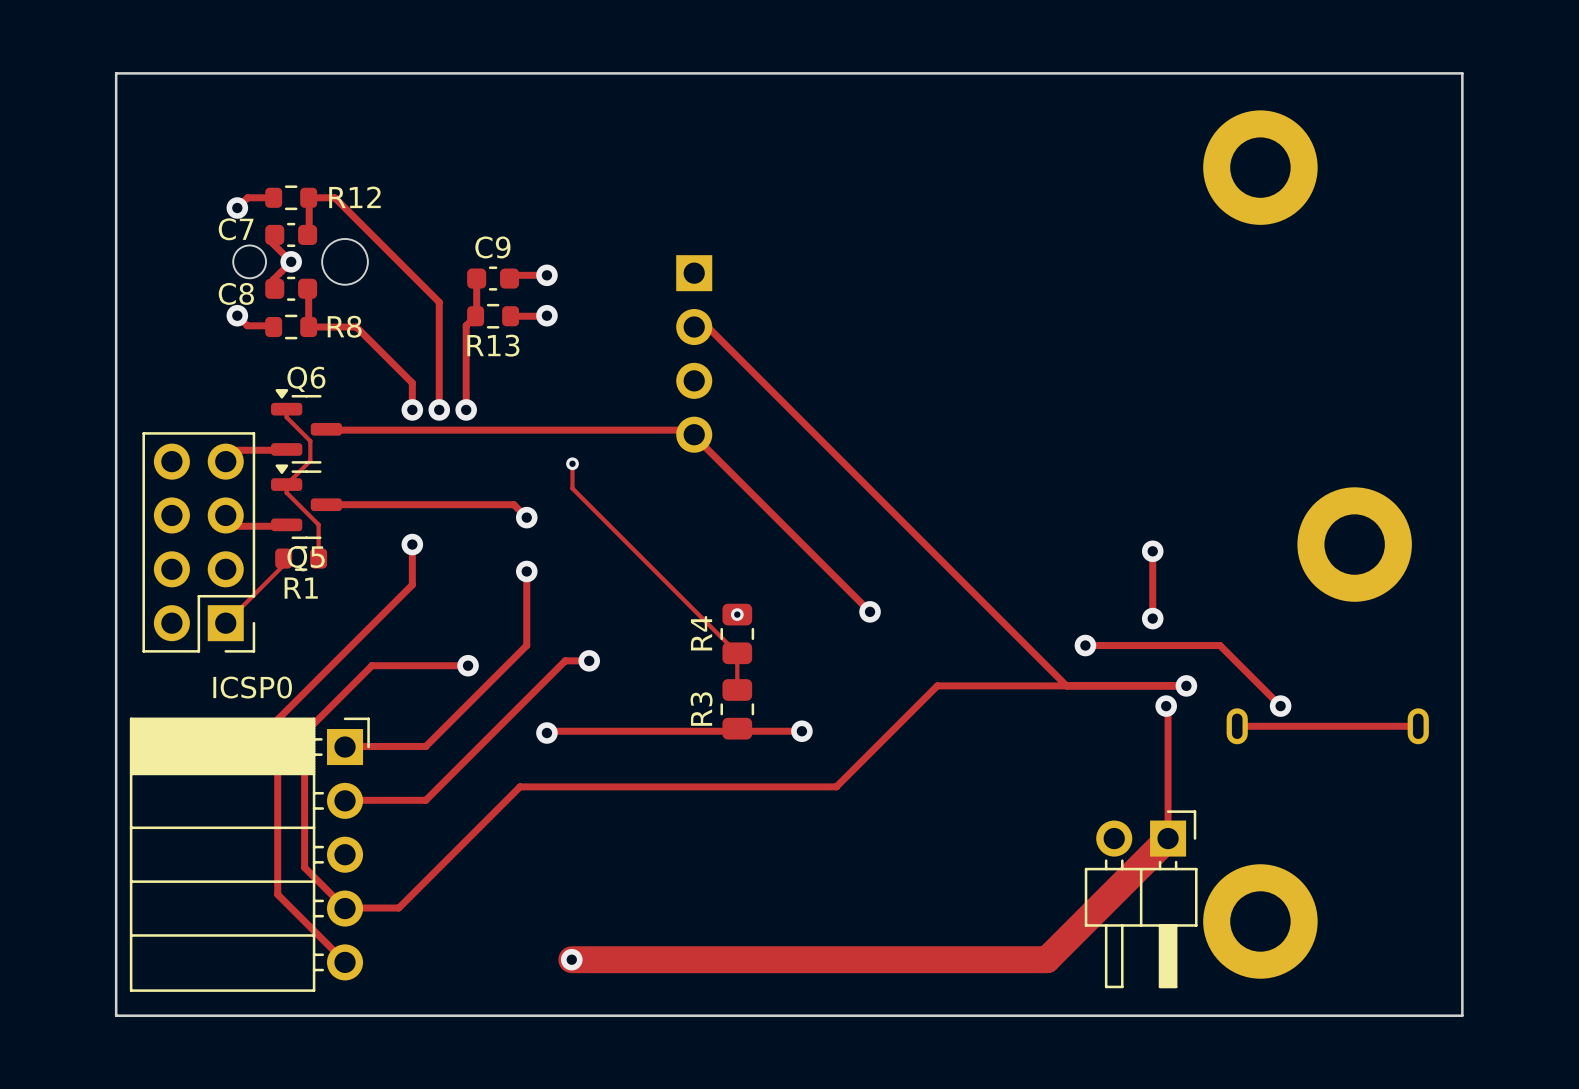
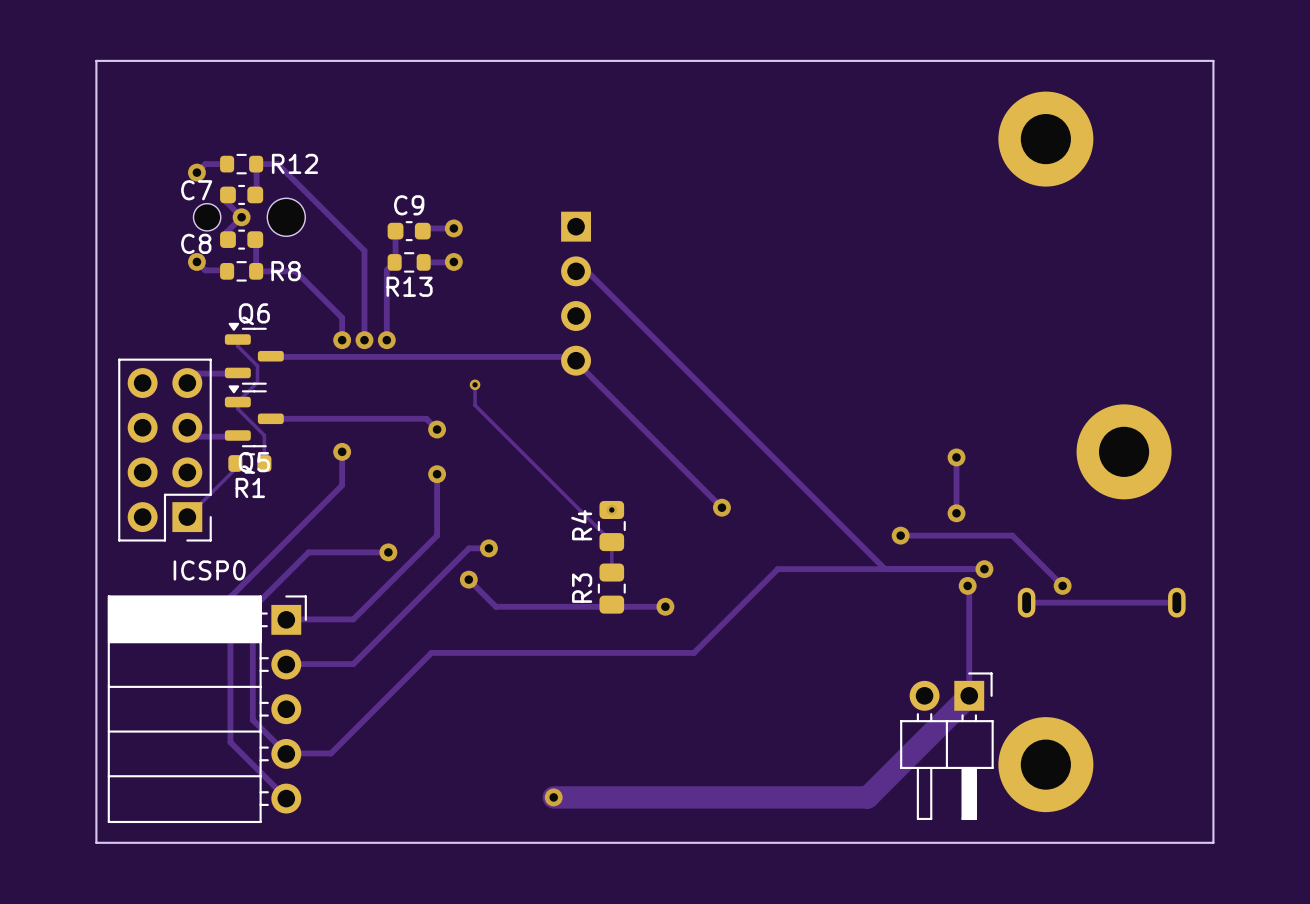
track: (597, 731) (548, 731) (546, 733) -> (495, 606) (468, 579)
via position: (546, 733) -> (468, 579)
track: (571, 959) (1046, 959) -> (553, 797) (868, 796)
via position: (571, 959) -> (553, 797)

